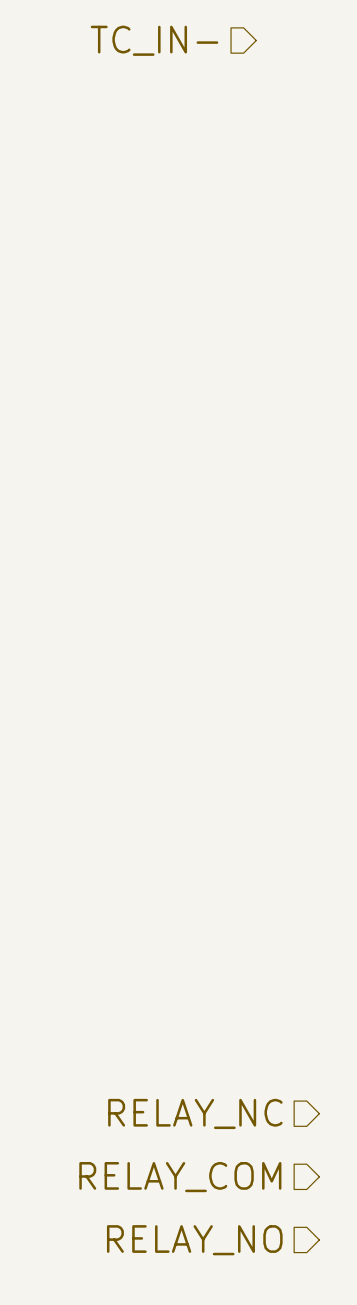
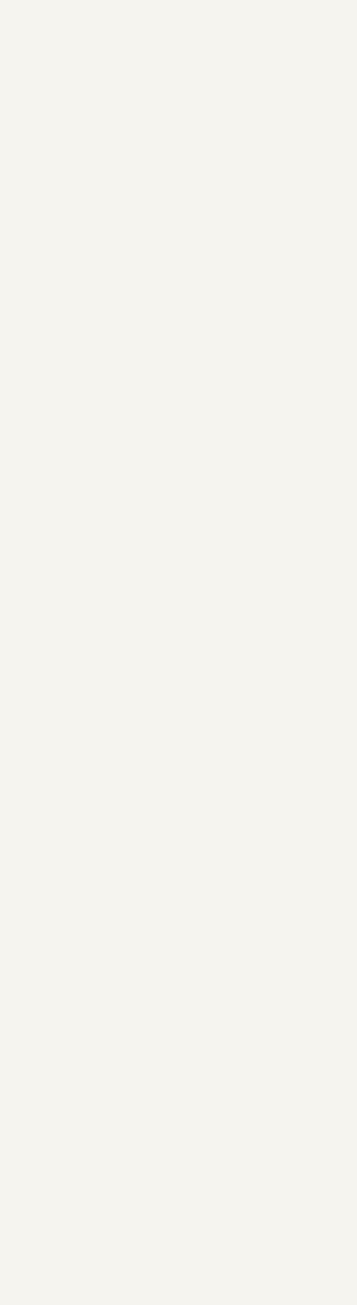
hierarchical label: TC_IN- (154, 40) -> none
hierarchical label: RELAY_NC (195, 1113) -> none
hierarchical label: RELAY_COM (180, 1177) -> none
hierarchical label: RELAY_NO (194, 1240) -> none

